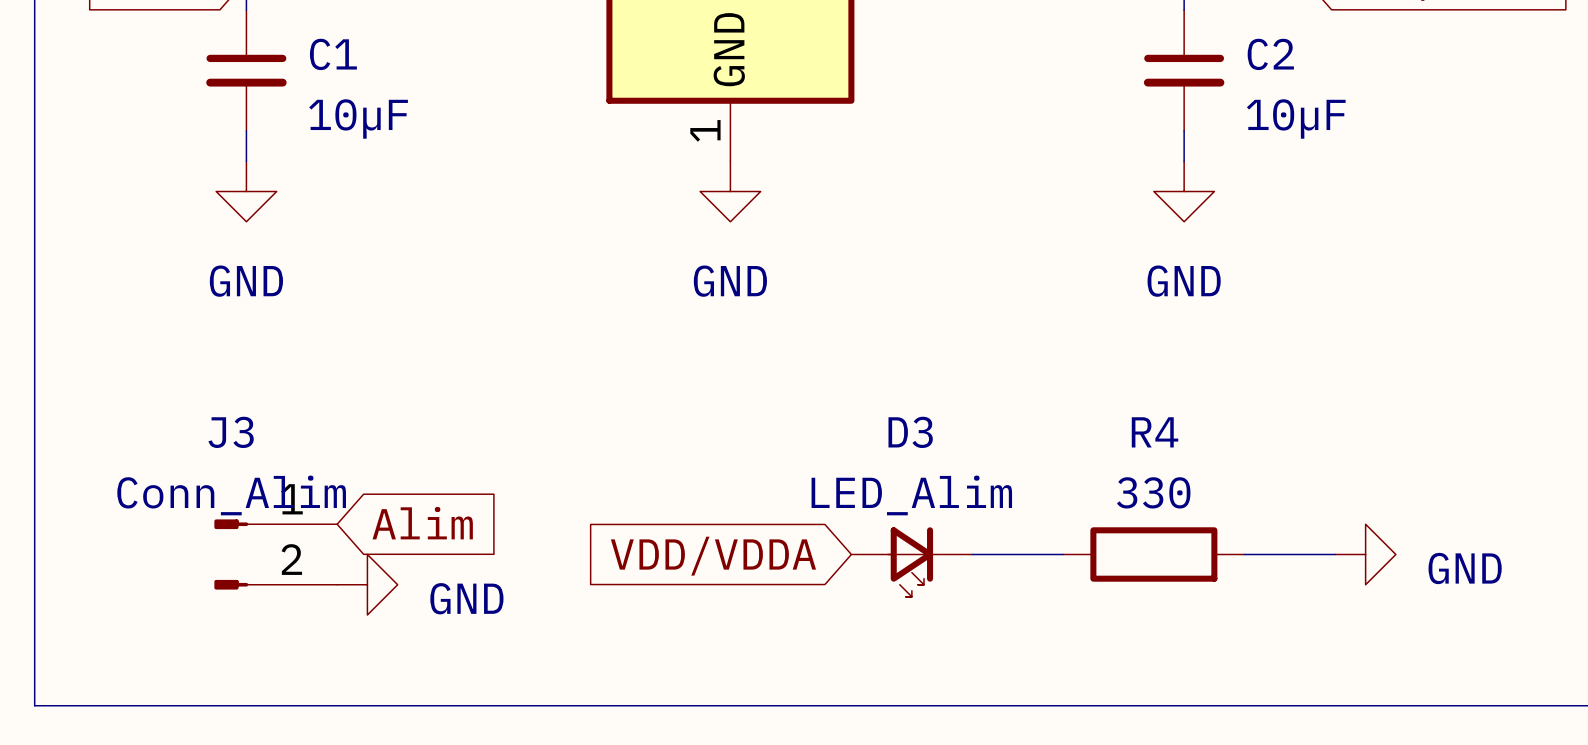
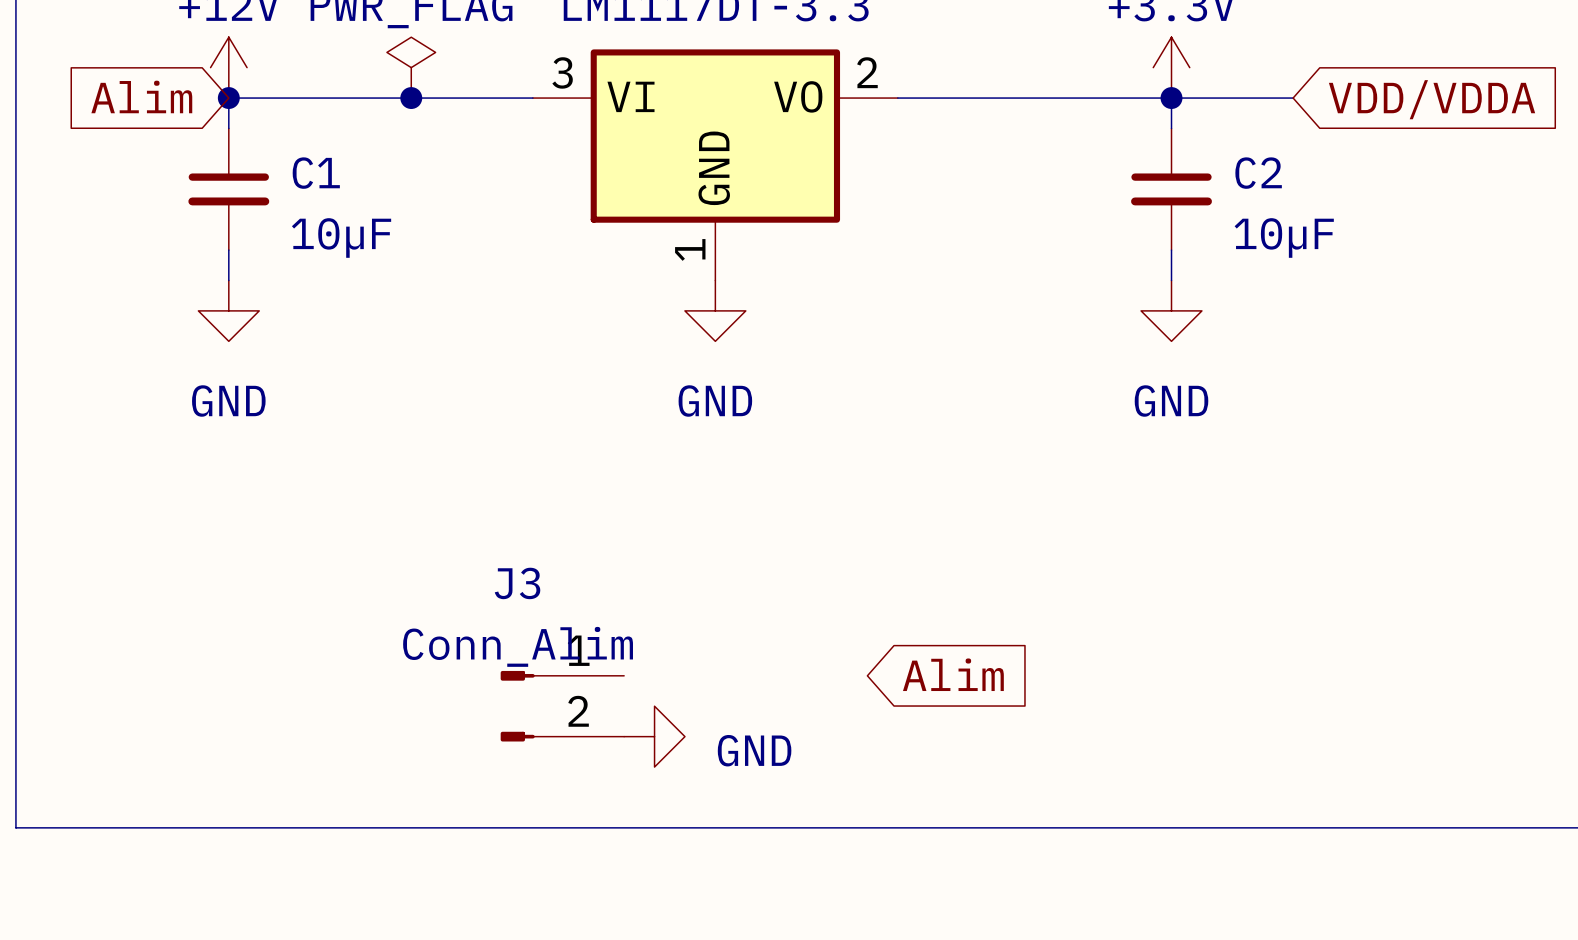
global label position: Alim (422, 523) -> Alim (953, 674)
J3 position: (275, 554) -> (562, 706)
wire: (972, 554) (1063, 554) -> none
R4: 330 (1153, 554) -> none
wire: (1244, 554) (1335, 554) -> none
power symbol: GND (1365, 554) -> none
global label: VDD/VDDA (713, 556) -> none
D3: LED_Alim (911, 562) -> none
power symbol position: GND (367, 584) -> GND (654, 736)

